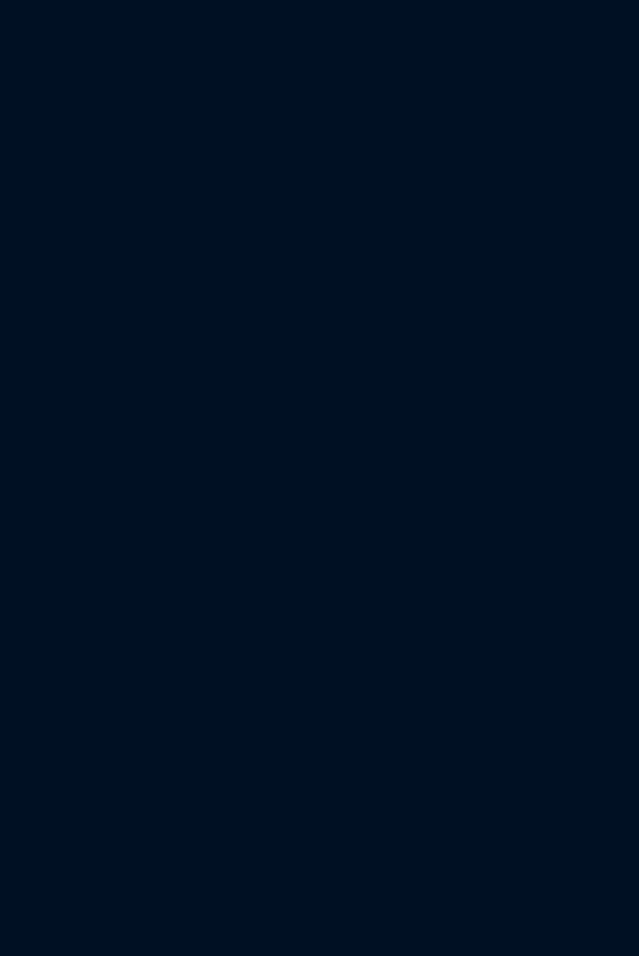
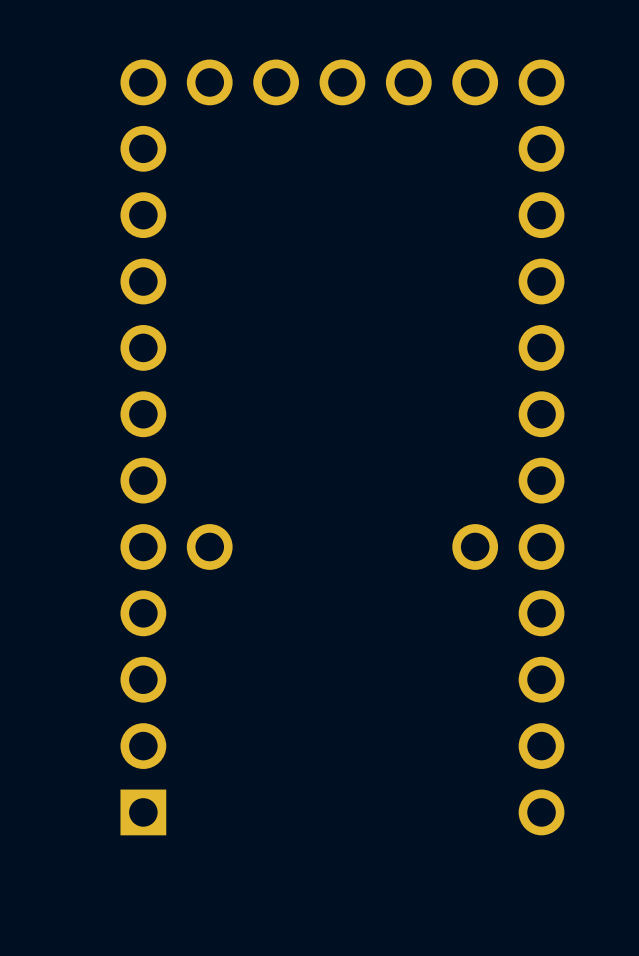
part: none -> (342, 447)

